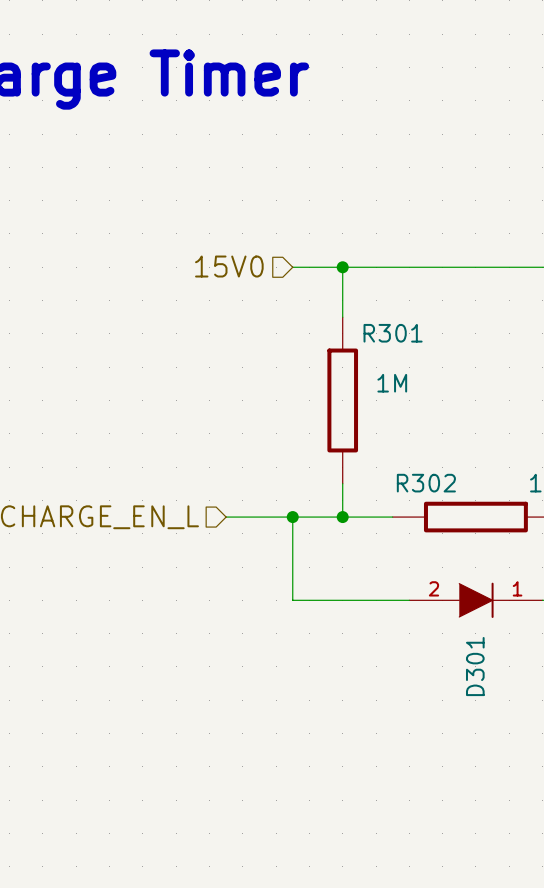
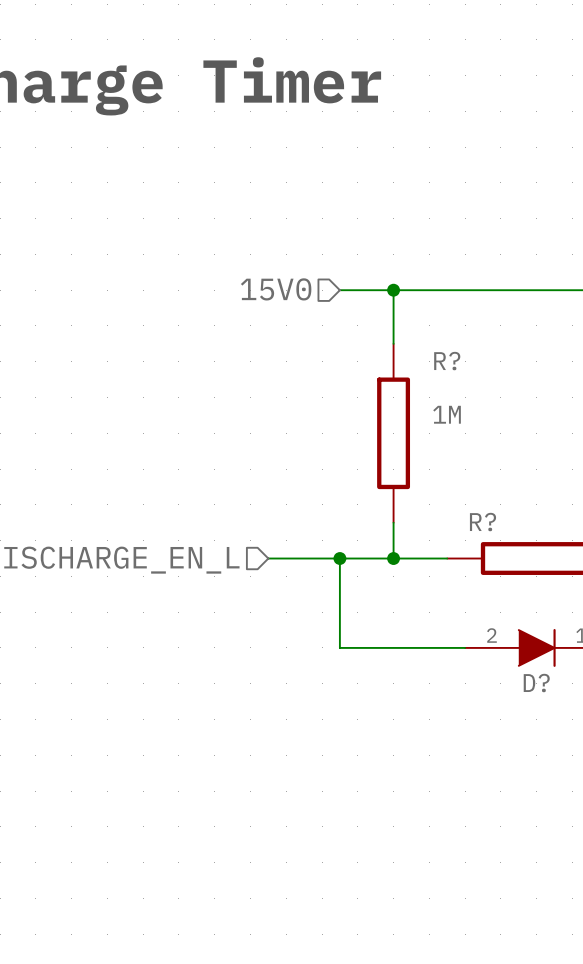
R301 name: R301 (393, 333) -> R? (447, 361)
R302 name: R302 (426, 483) -> R? (483, 522)
D301 name: D301 (475, 666) -> D? (536, 683)

